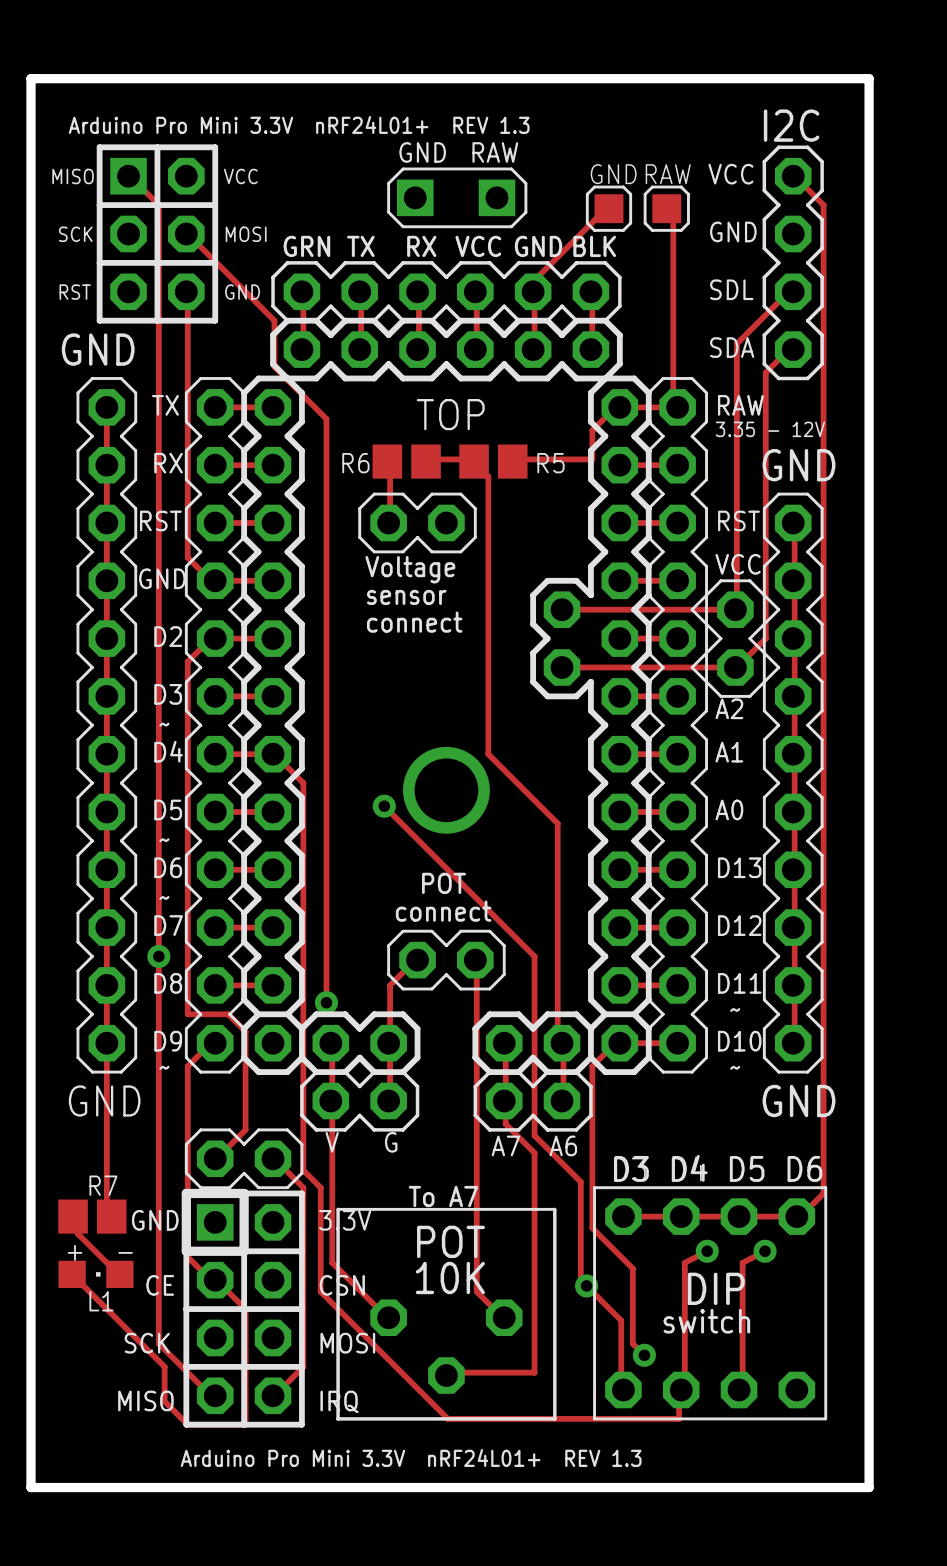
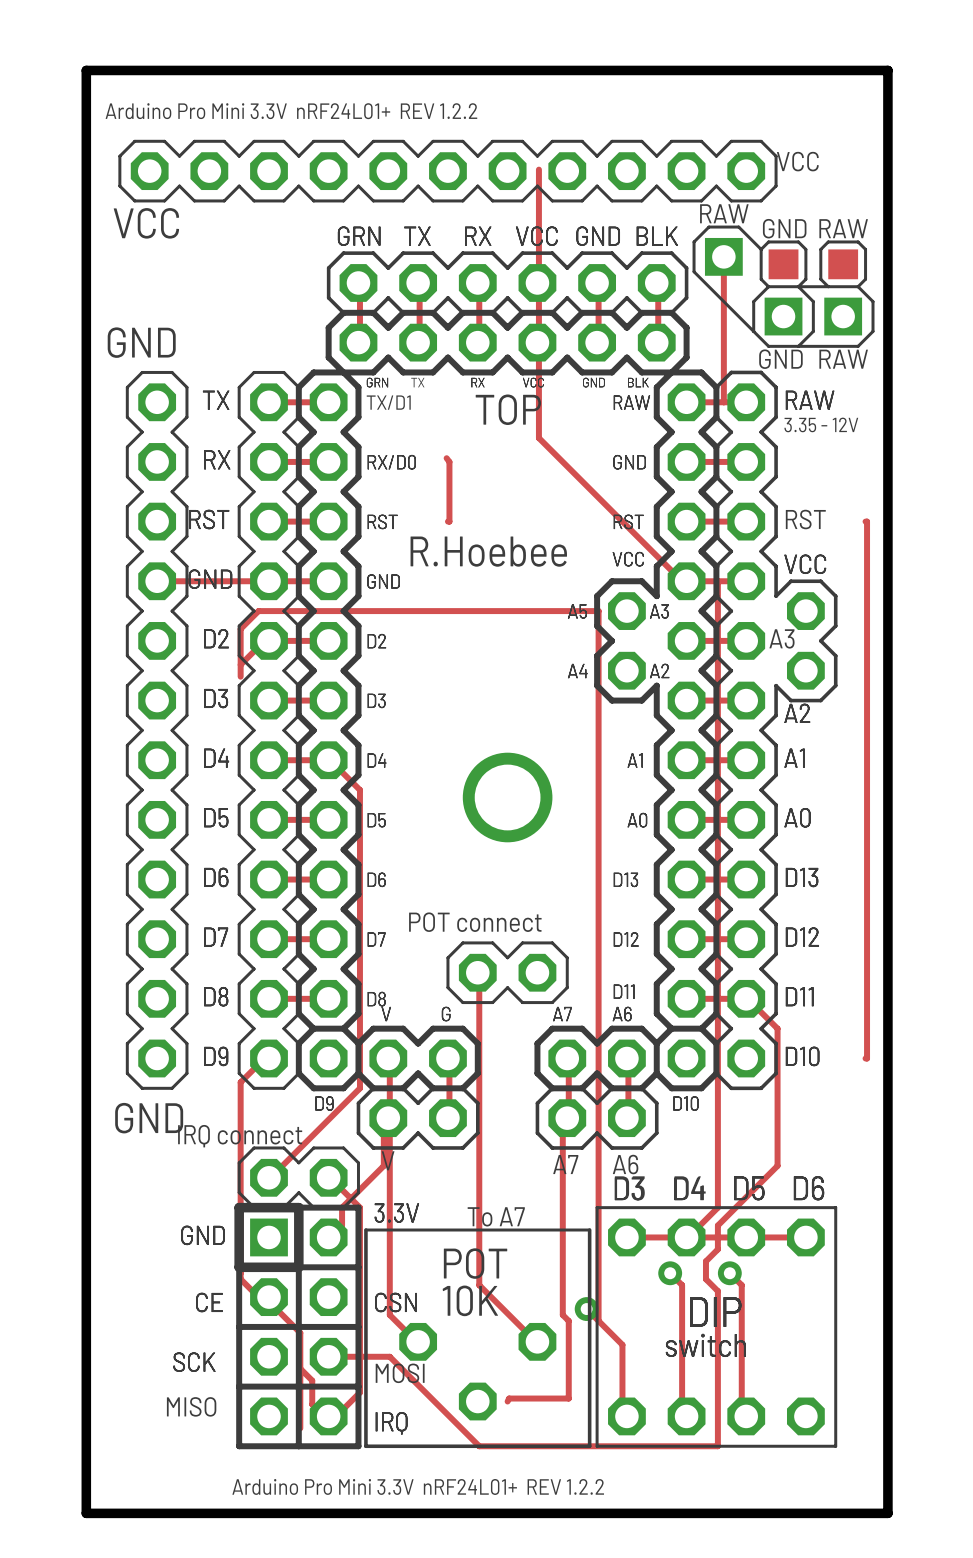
board edge: (30, 78) (30, 1487) (869, 1487) (869, 78) (30, 78) -> (86, 70) (86, 1513) (887, 1513) (887, 70) (86, 70)
text: Arduino Pro Mini 3.3V nRF24L01+ REV 1.3 (299, 124) -> Arduino Pro Mini 3.3V nRF24L01+ REV 1.2.2 (291, 111)
text: I2C (791, 125) -> none
text: GND (422, 152) -> none
text: RAW (495, 152) -> none
track: (128, 176) (158, 205) (158, 1343) (210, 1395) (215, 1395) -> none
track: (793, 176) (823, 205) (823, 1193) (800, 1216) (735, 1216) -> none
track: none -> (538, 169) (538, 282)
part: none -> (447, 171)
part: (457, 197) -> none
track: (608, 208) (603, 210) (534, 280) (534, 291) -> none
part: (637, 208) -> none
track: (666, 208) (673, 216) (673, 407) -> none
text: GND (733, 231) -> none
text: none -> VCC (146, 223)
part: (157, 233) -> none
track: (186, 233) (274, 320) (274, 366) (326, 418) (326, 1002) -> none
part: (793, 262) -> none
track: none -> (723, 256) (723, 402)
text: SDL (731, 289) -> none
track: (186, 291) (187, 557) (210, 580) -> (149, 581) (264, 581)
track: (793, 291) (788, 291) (736, 343) (736, 609) (562, 609) -> none
part: none -> (783, 286)
part footprint: [241, 317, 652, 1075] -> [295, 309, 720, 1092]
text: SDA (732, 347) -> none
track: none -> (538, 342) (538, 438) (682, 581) (686, 581)
track: (793, 349) (788, 349) (765, 372) (765, 638) (736, 667) (562, 667) -> none
track: (106, 407) (106, 1216) (111, 1216) -> none
track: (619, 407) (615, 407) (592, 430) (592, 459) (517, 459) (512, 461) -> none
part: (406, 461) -> none
track: (426, 461) (430, 459) (470, 459) (488, 476) (488, 754) (557, 823) (557, 1043) (562, 1043) -> none
part: (493, 461) -> none
text: R6 (355, 463) -> none
text: R5 (550, 463) -> none
text: GND (799, 465) -> none
part: (417, 522) -> none
text: Voltage (410, 569) -> R.Hoebee (488, 551)
track: none -> (717, 581) (717, 1207) (688, 1237) (626, 1237)
text: sensor (406, 597) -> none
text: connect (414, 622) -> none
text: none -> A3 (781, 638)
part: (735, 638) -> none
track: (187, 673) (187, 1014) (228, 1014) (245, 1031) (245, 1129) -> (359, 1088) (300, 1147)
text: ~ (164, 724) -> none
part: (677, 725) -> none
part: none -> (776, 730)
part: (793, 783) -> none
track: (384, 806) (534, 956) -> (240, 664) (240, 628) (258, 611) (598, 611) (598, 969)
via: (384, 806) -> none
text: ~ (164, 840) -> none
text: POT (444, 883) -> none
text: ~ (164, 897) -> none
text: connect (443, 911) -> POT connect (475, 922)
via: (158, 956) -> none
track: none -> (470, 972) (479, 980) (479, 1285) (537, 1341)
track: (417, 960) (390, 985) (390, 1043) -> none
track: (475, 960) (476, 1291) (504, 1317) -> none
via: (326, 1002) -> none
text: ~ (735, 1009) -> none
track: (677, 1043) (615, 1043) (592, 1066) (592, 1228) (632, 1268) (632, 1343) (644, 1355) -> none
text: ~ (164, 1067) -> none
text: ~ (735, 1067) -> none
track: (303, 1072) (303, 1170) (320, 1187) (320, 1291) (447, 1418) -> (328, 1356) (389, 1356) (479, 1446) (509, 1446)
track: none -> (388, 1118) (383, 1118) (383, 1165) (342, 1207) (342, 1225) (328, 1237)
track: (505, 1100) (505, 1124) (534, 1153) -> (598, 1153) (598, 1171)
text: GND (799, 1100) -> none
text: none -> IRQ connect (240, 1136)
track: (534, 1135) (580, 1181) (580, 1280) (621, 1320) (621, 1389) (623, 1389) -> none
text: G (391, 1142) -> none
text: R7 (103, 1185) -> none
part footprint: [181, 1188, 305, 1428] -> [234, 1202, 362, 1450]
track: (73, 1216) (77, 1216) (77, 1233) (119, 1274) -> none
part: (92, 1216) -> none
track: none -> (670, 1273) (682, 1285) (682, 1416) (686, 1416)
via: none -> (670, 1273)
track: none -> (729, 1273) (741, 1285) (741, 1416) (746, 1416)
via: none -> (729, 1273)
track: (707, 1251) (684, 1262) (684, 1389) (679, 1389) (679, 1418) (650, 1418) -> (746, 998) (777, 1028) (777, 1165) (717, 1225) (717, 1249) (705, 1261) (705, 1279) (717, 1291) (717, 1446)
via: (707, 1251) -> none
track: (765, 1251) (742, 1262) (742, 1389) (739, 1389) -> none
via: (765, 1251) -> none
text: + (75, 1252) -> none
text: - (125, 1252) -> none
track: (332, 1262) (388, 1317) -> (389, 1285) (389, 1315) (418, 1341)
track: (72, 1274) (164, 1366) (164, 1401) (187, 1424) (245, 1424) (245, 1401) -> none
part: (96, 1274) -> none
track: none -> (586, 1309) (622, 1344) (622, 1416) (626, 1416)
via: none -> (586, 1309)
via: (586, 1285) -> none
track: (534, 1297) (534, 1372) (505, 1372) -> (567, 1118) (562, 1118) (562, 1315) (568, 1320) (568, 1398)
text: L1 (101, 1301) -> none
part position: (710, 1303) -> (716, 1326)
part position: (446, 1314) -> (477, 1338)
track: none -> (300, 1368) (312, 1380) (312, 1404) (324, 1416) (328, 1416)
via: (644, 1355) -> none
text: Arduino Pro Mini 3.3V nRF24L01+ REV 1.3 (411, 1457) -> Arduino Pro Mini 3.3V nRF24L01+ REV 1.2.2 (418, 1486)

